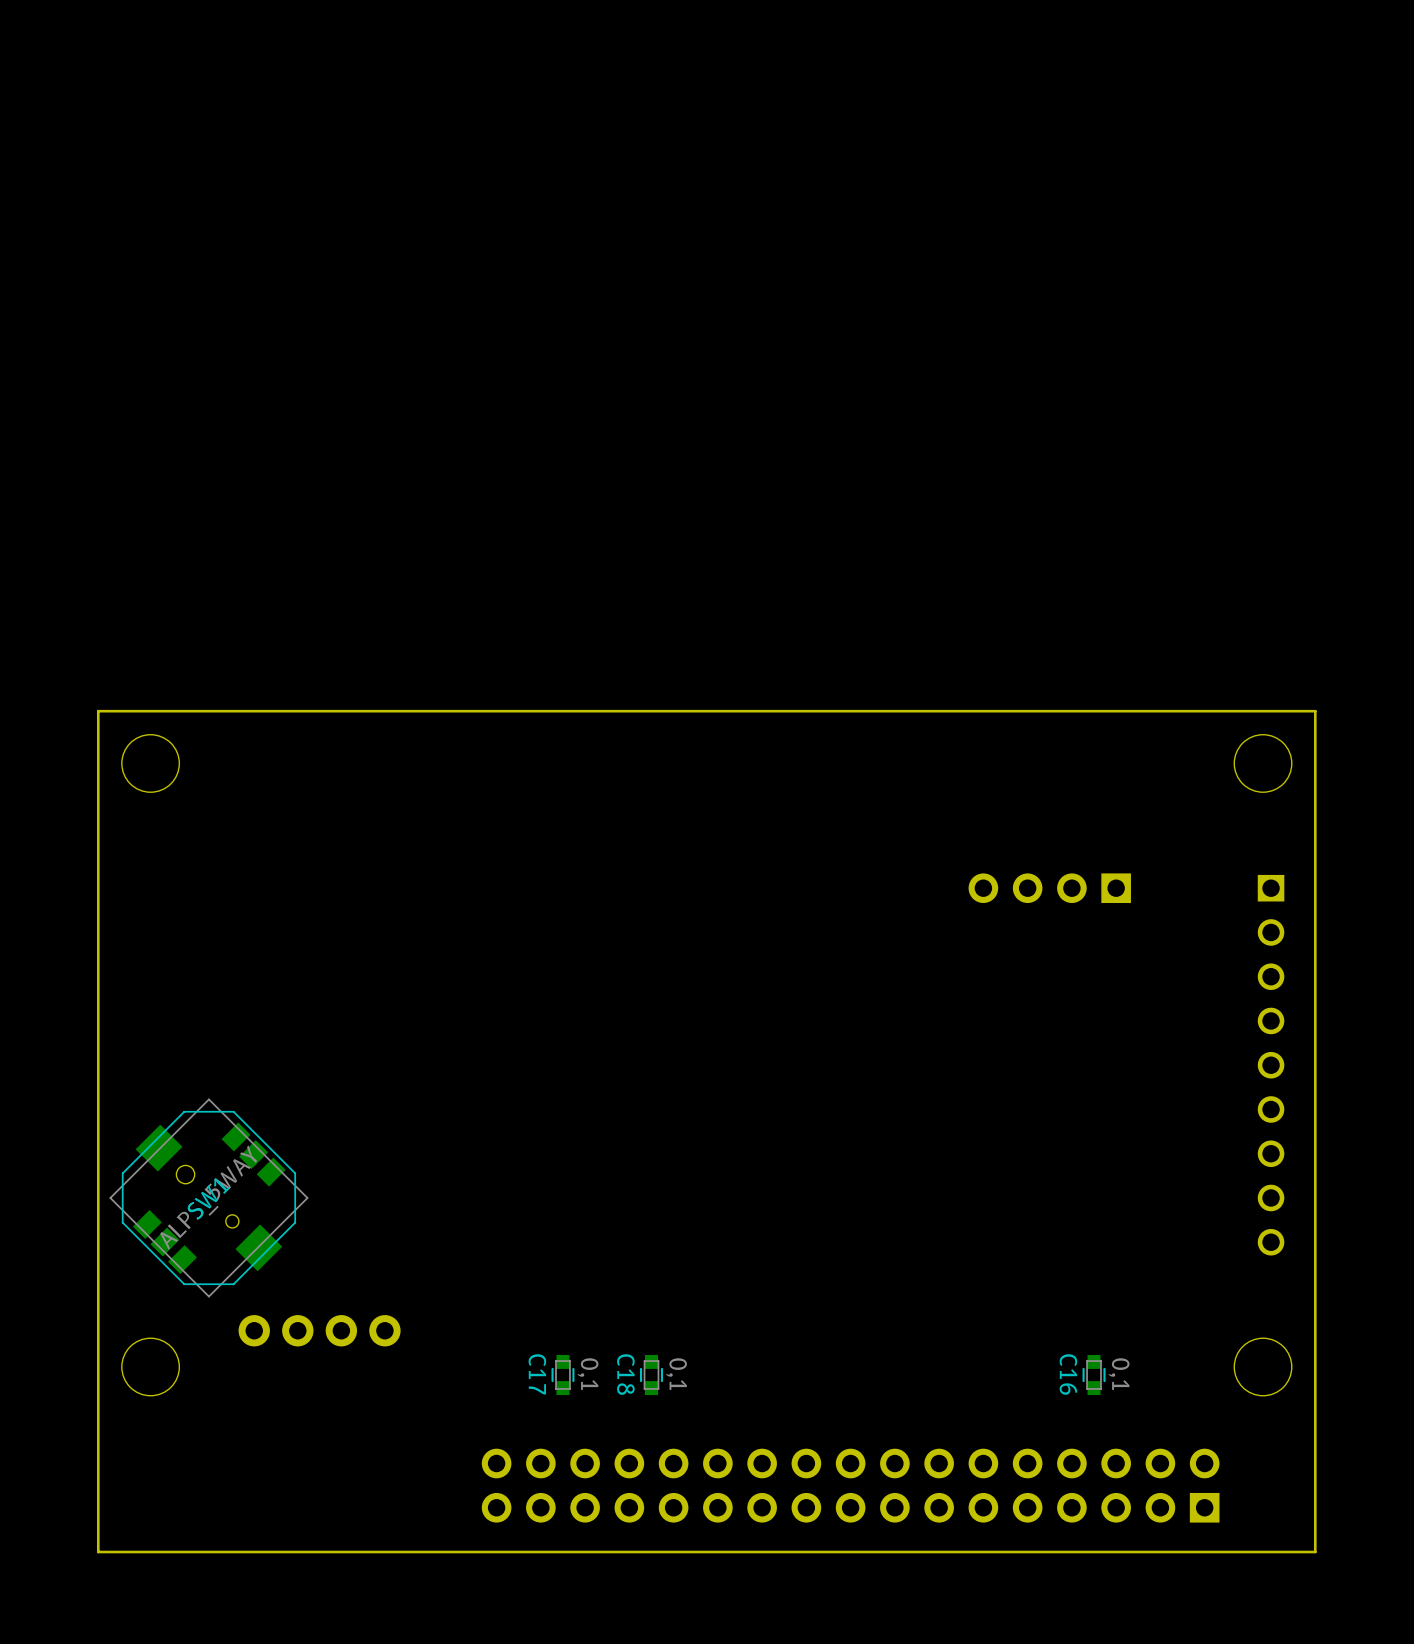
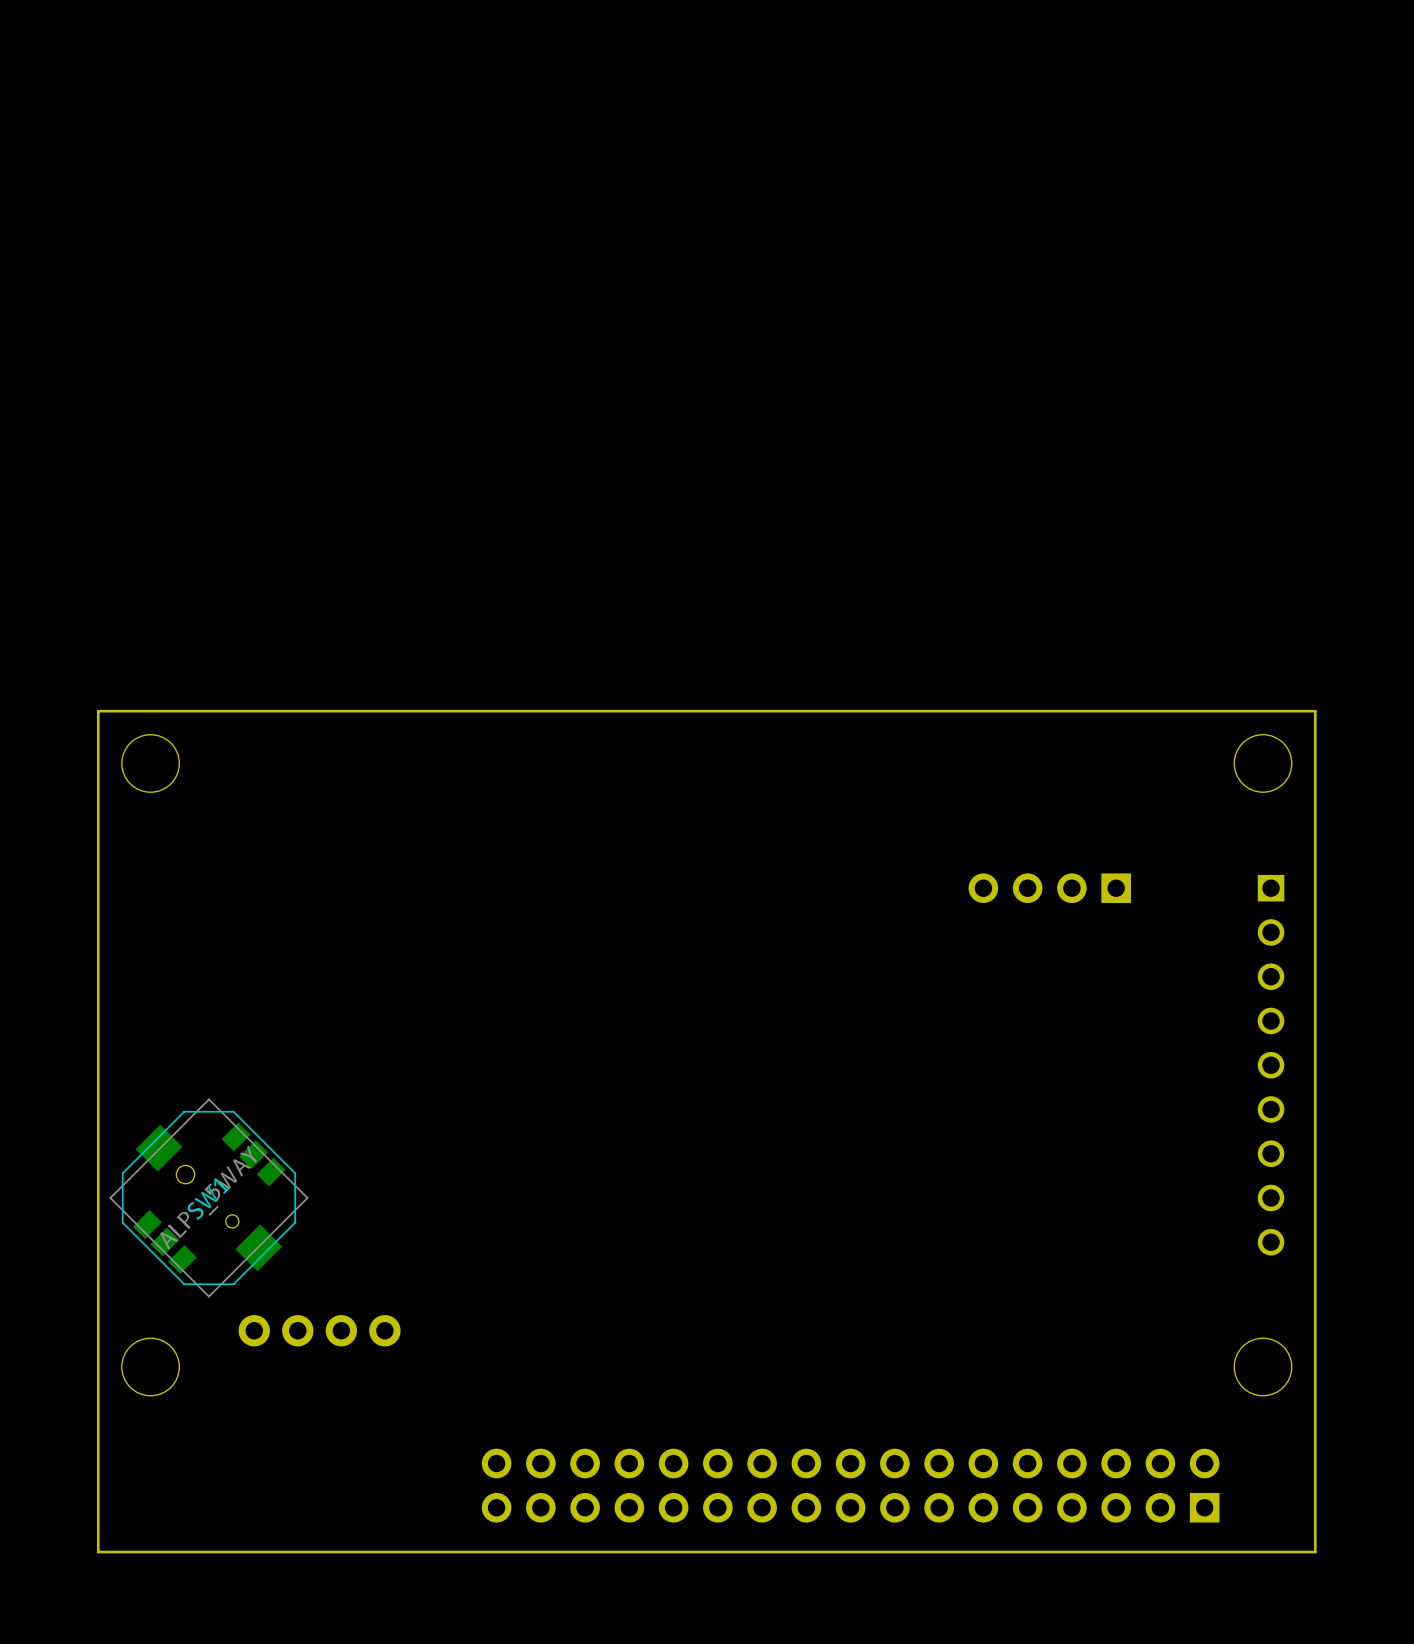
C17: 0,1 (562, 1375) -> none
C18: 0,1 (651, 1375) -> none
C16: 0,1 (1094, 1375) -> none

